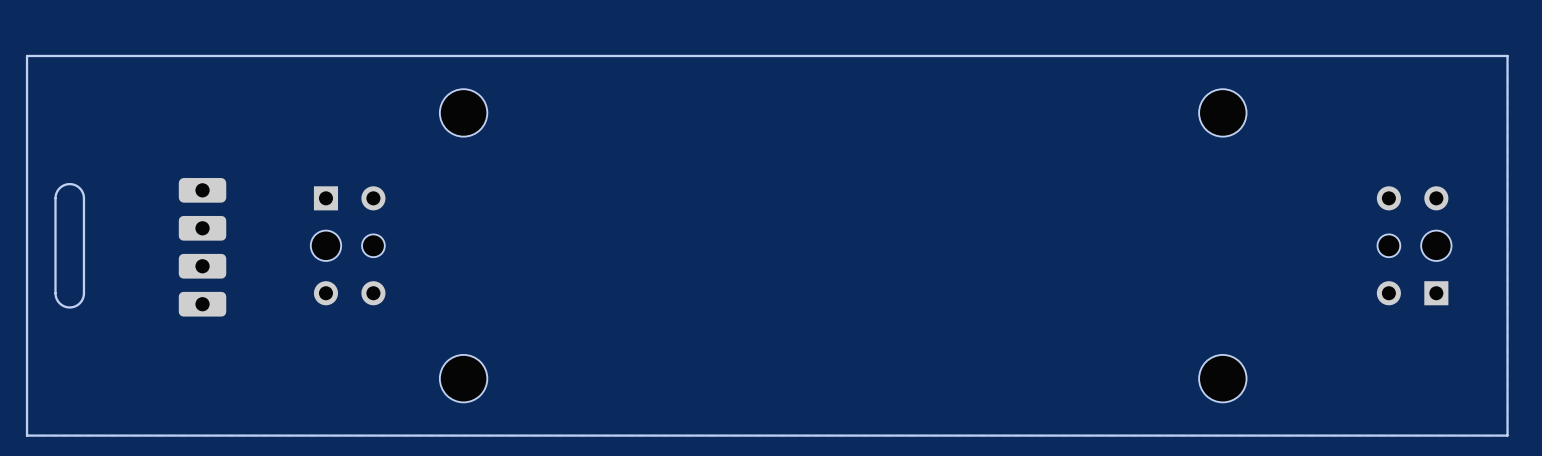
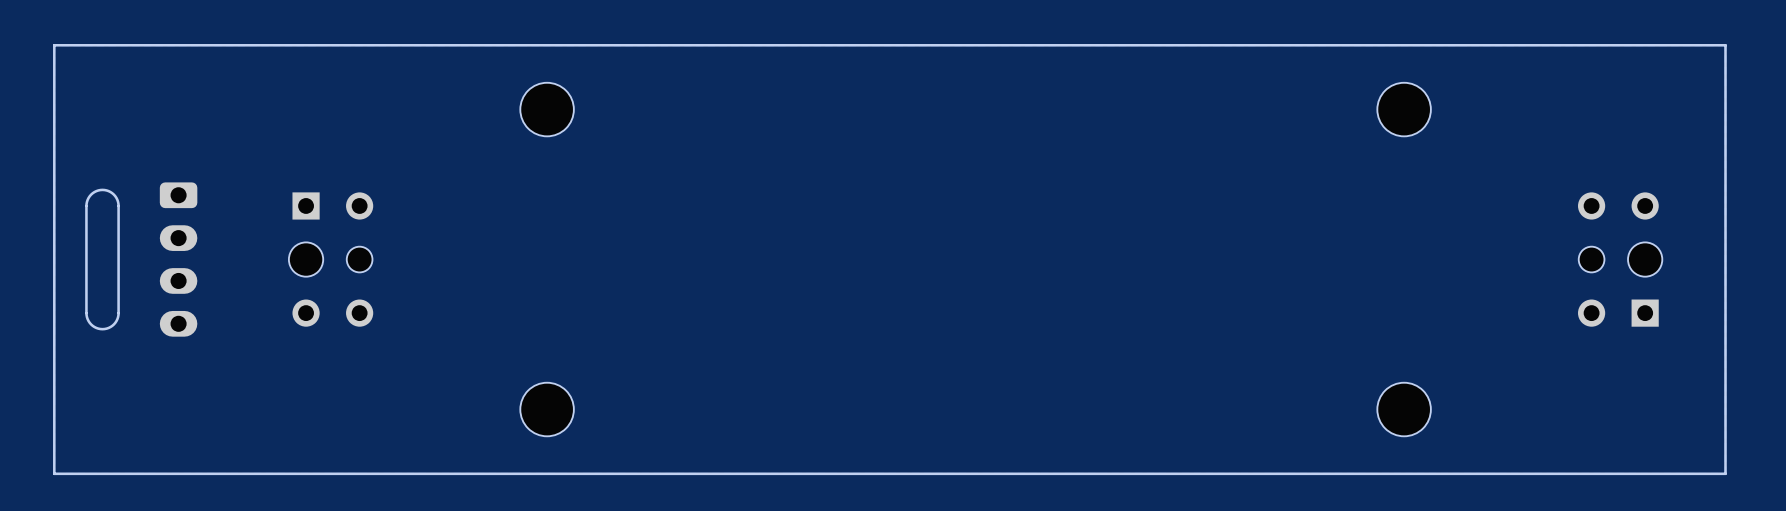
part: none -> (178, 259)
part position: (348, 245) -> (331, 259)
part: (202, 247) -> none

